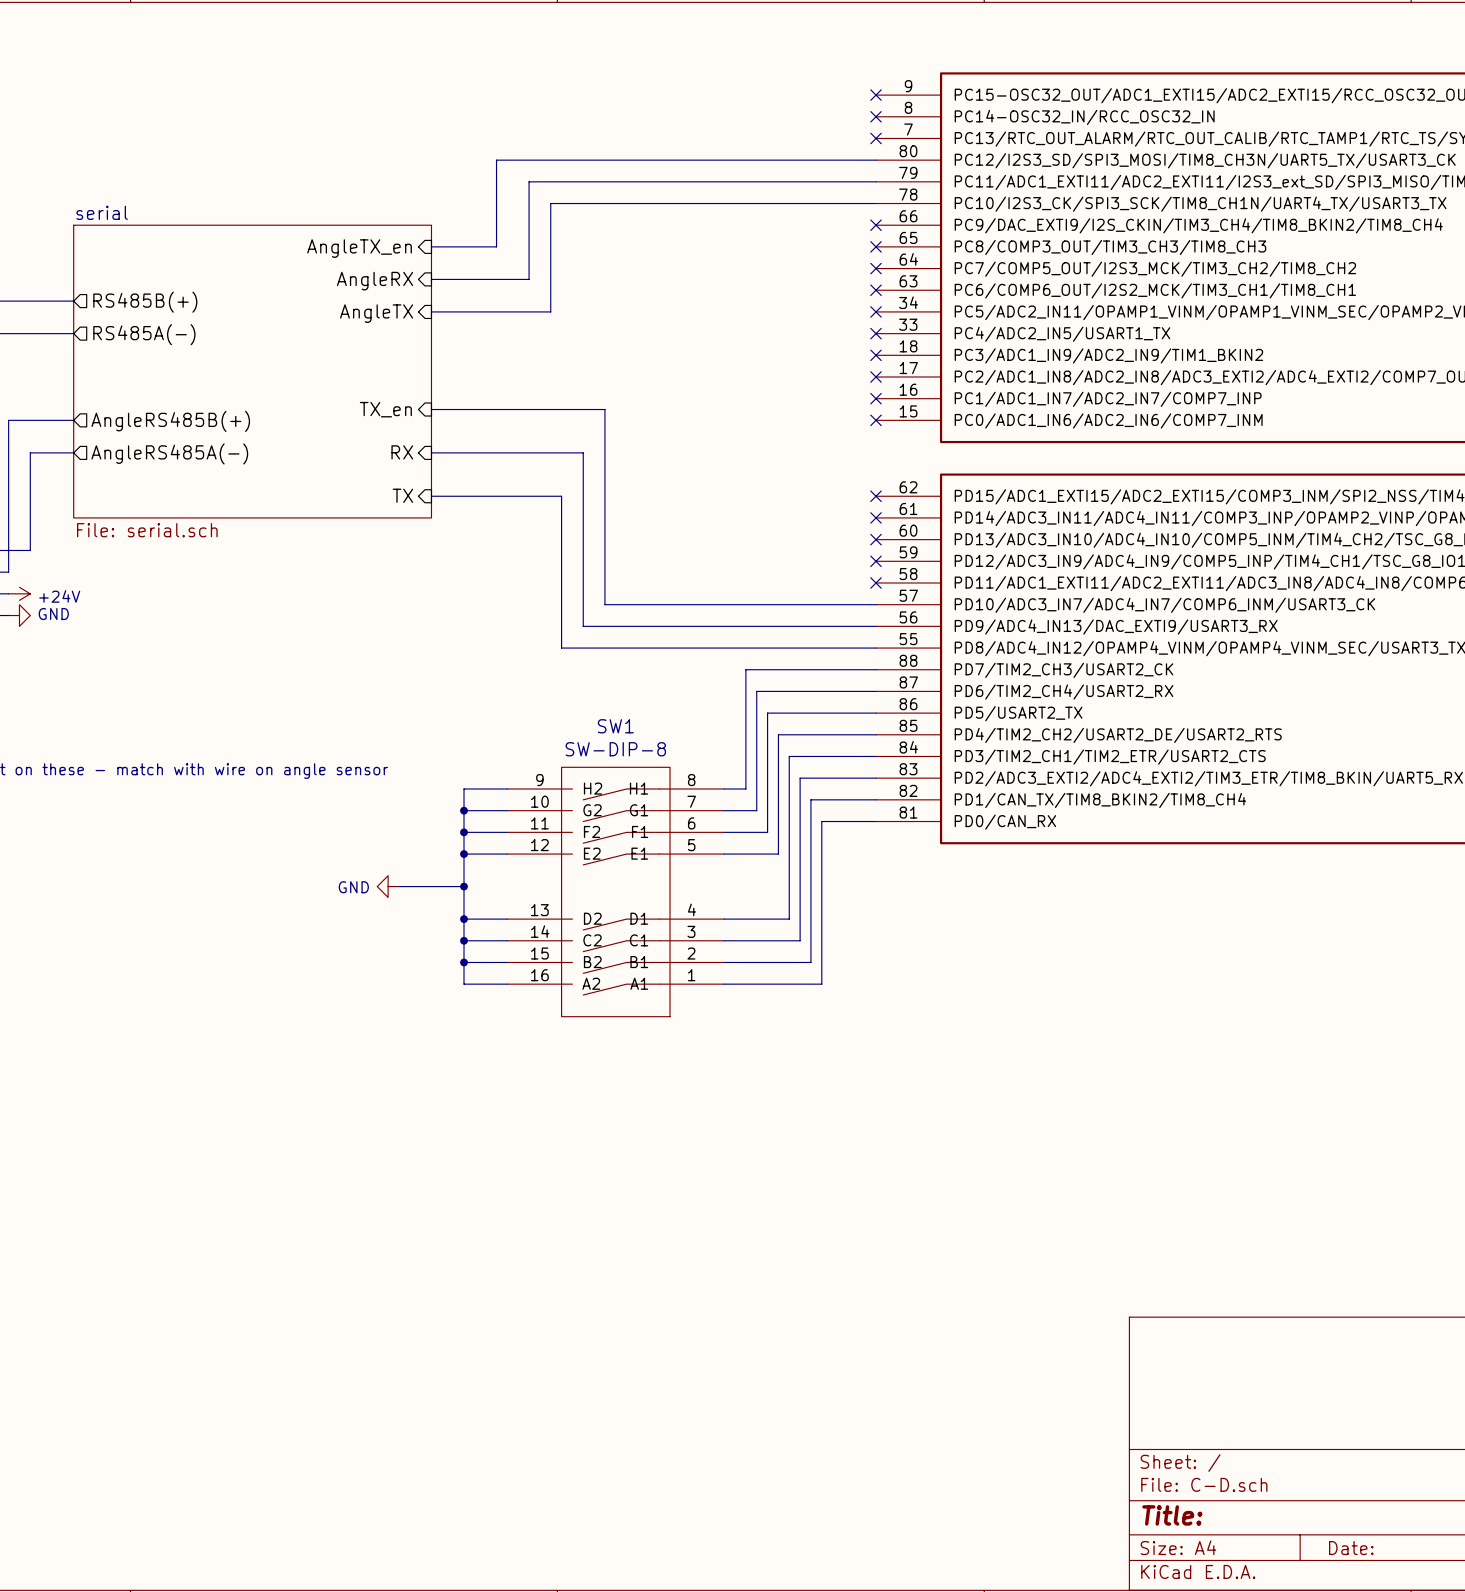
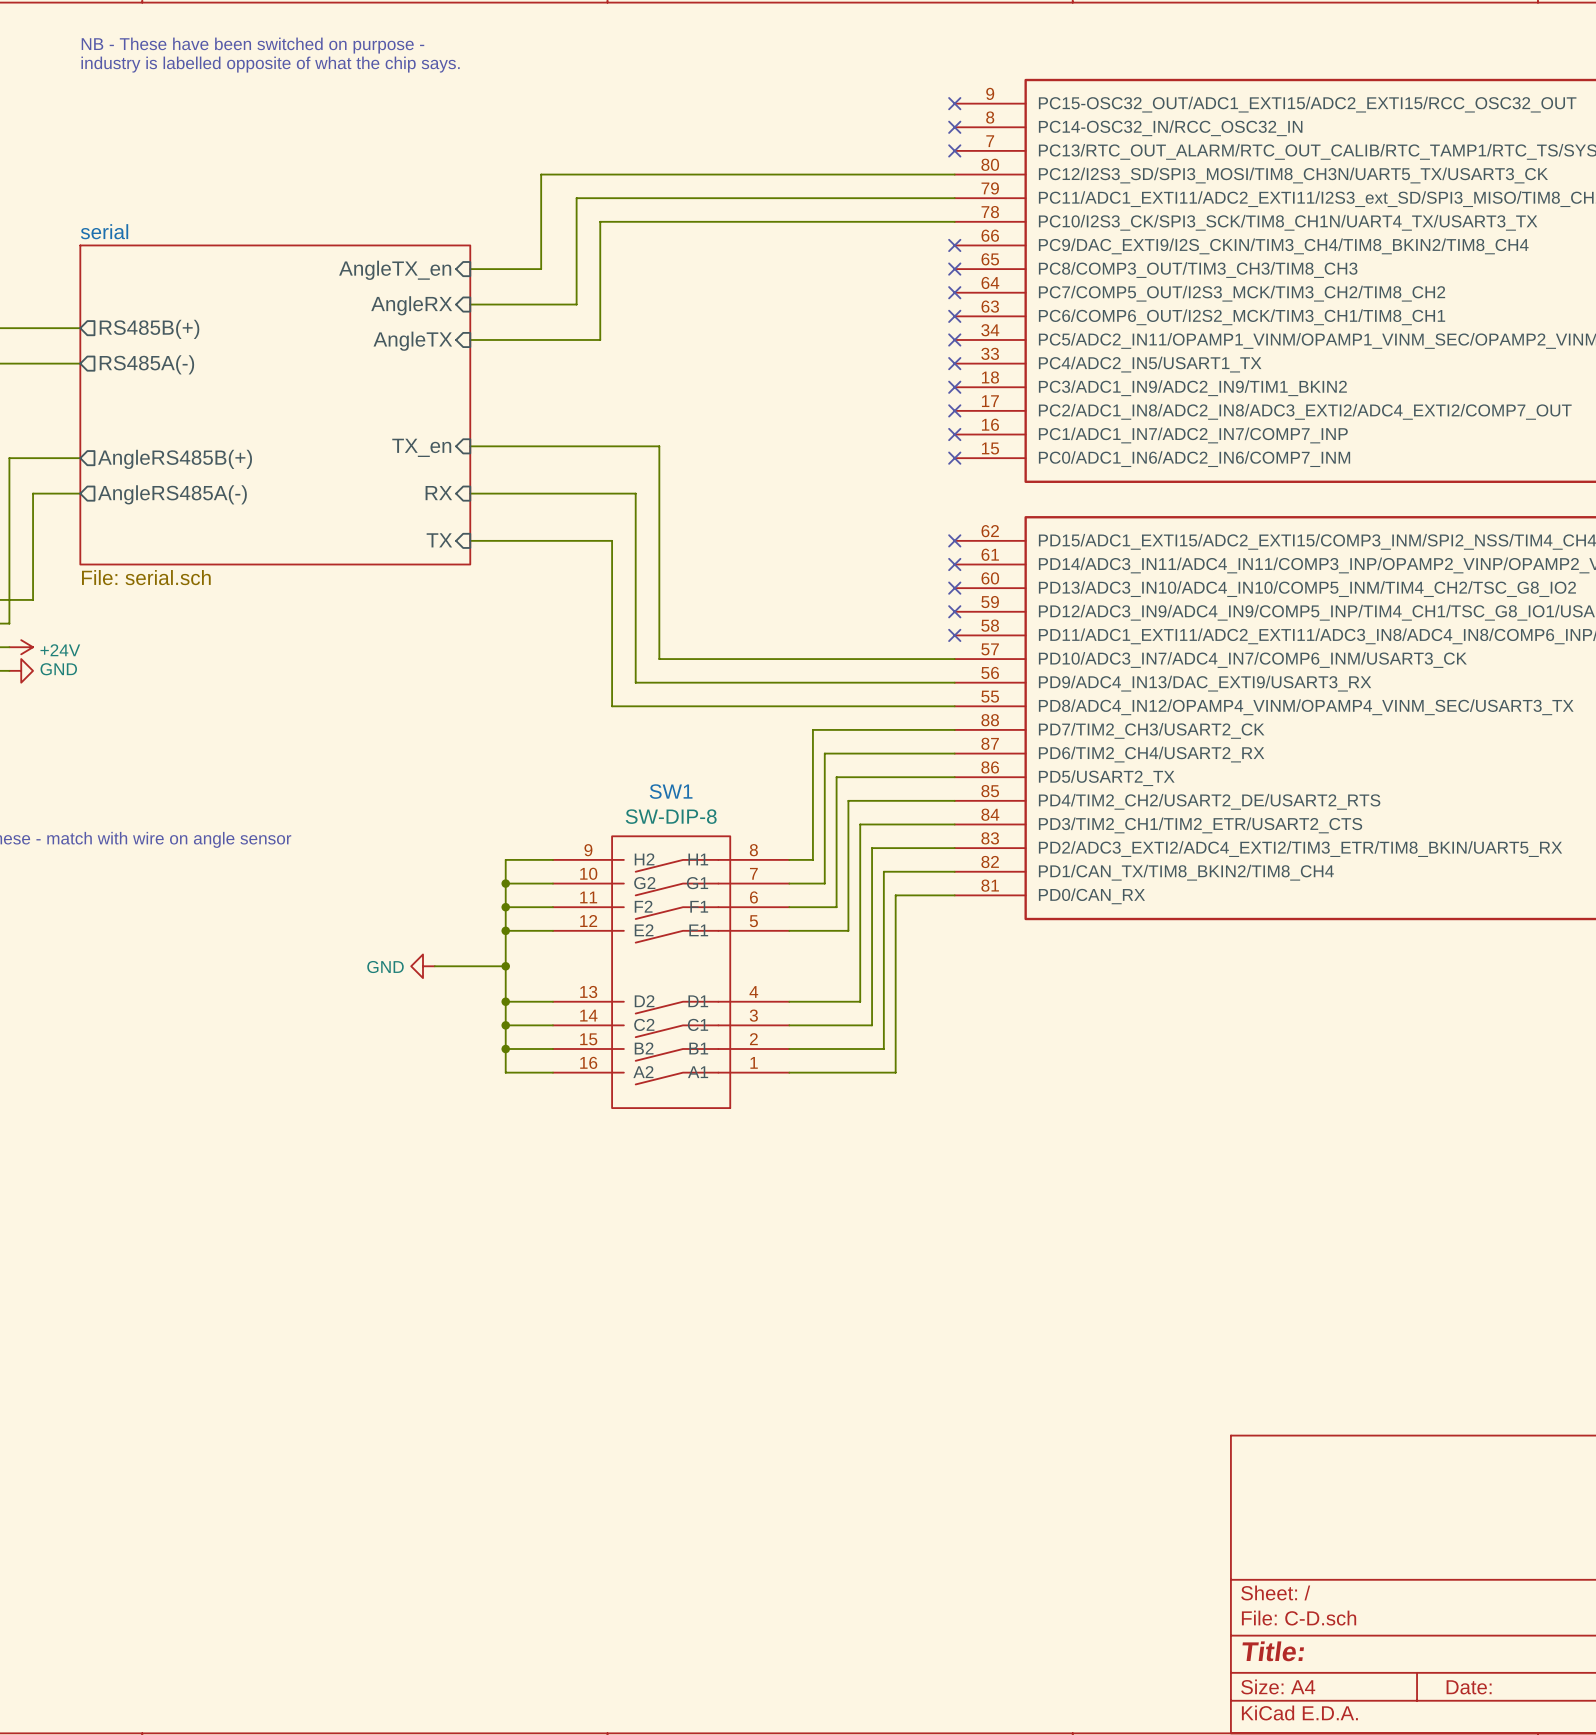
text: none -> NB - These have been switched on purpose - (252, 45)
text: none -> industry is labelled opposite of what the chip says. (270, 64)

